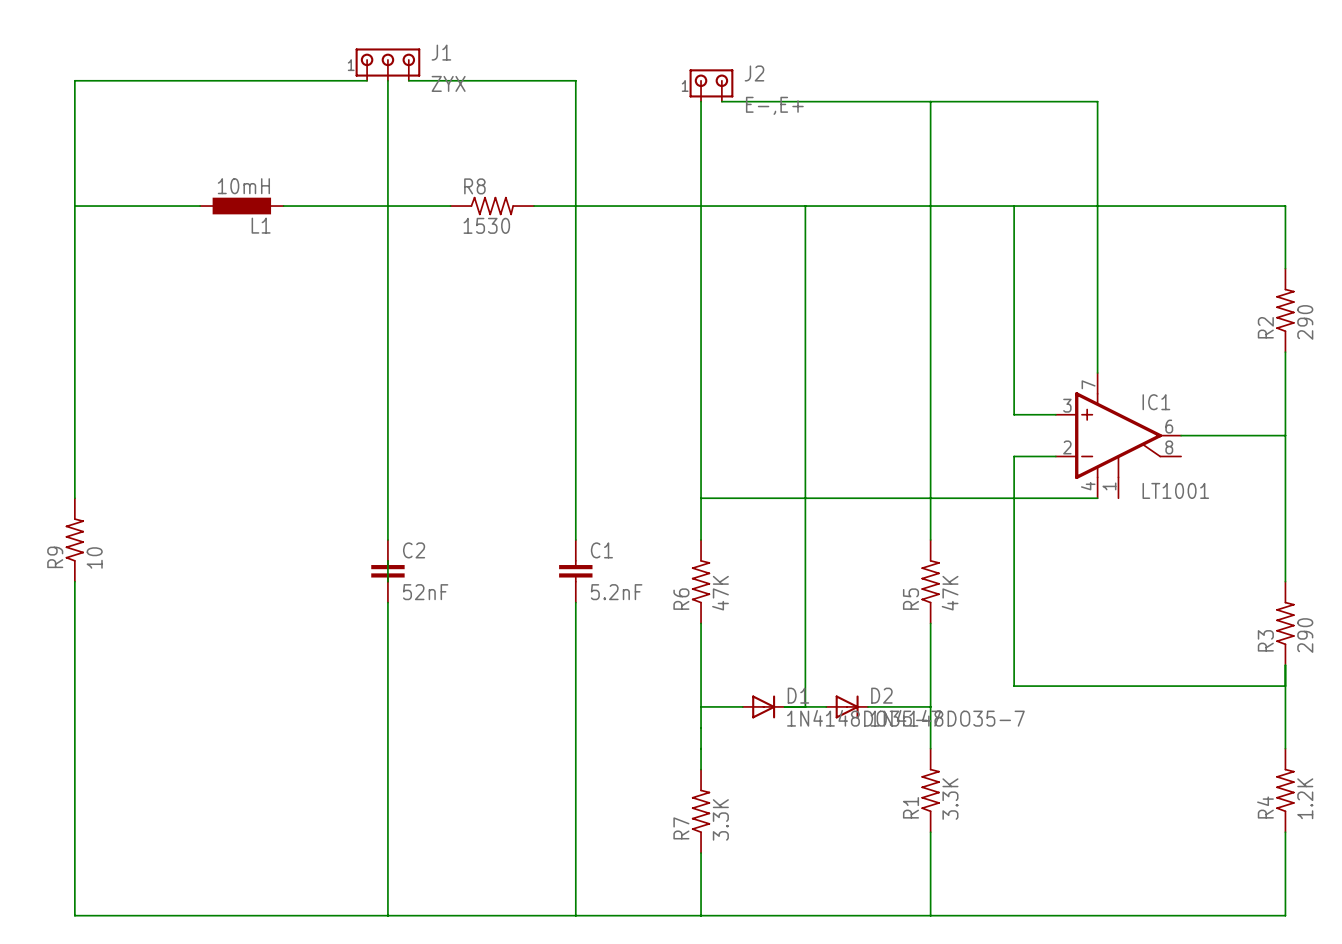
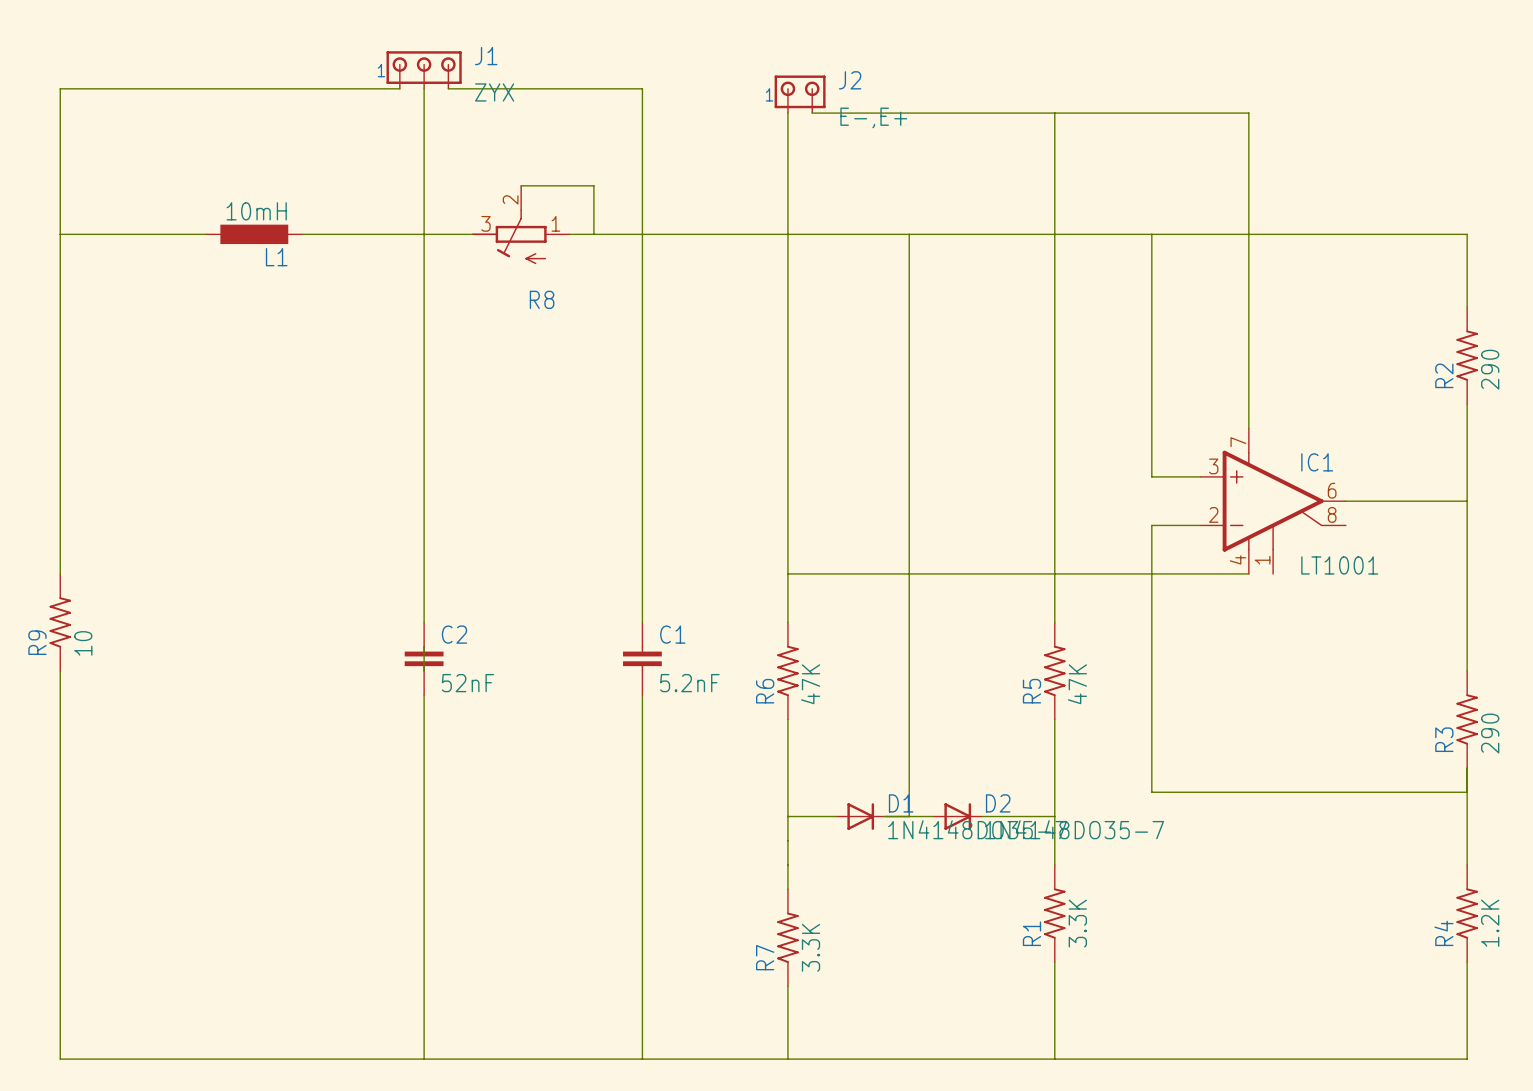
wire: none -> (521, 185) (593, 185) (593, 234) (569, 234)
R8 name position: R8 (474, 186) -> R8 (542, 299)
R8 symbol: [450, 196, 535, 216] -> [471, 185, 570, 265]
R8 value: 1530 (486, 225) -> none

